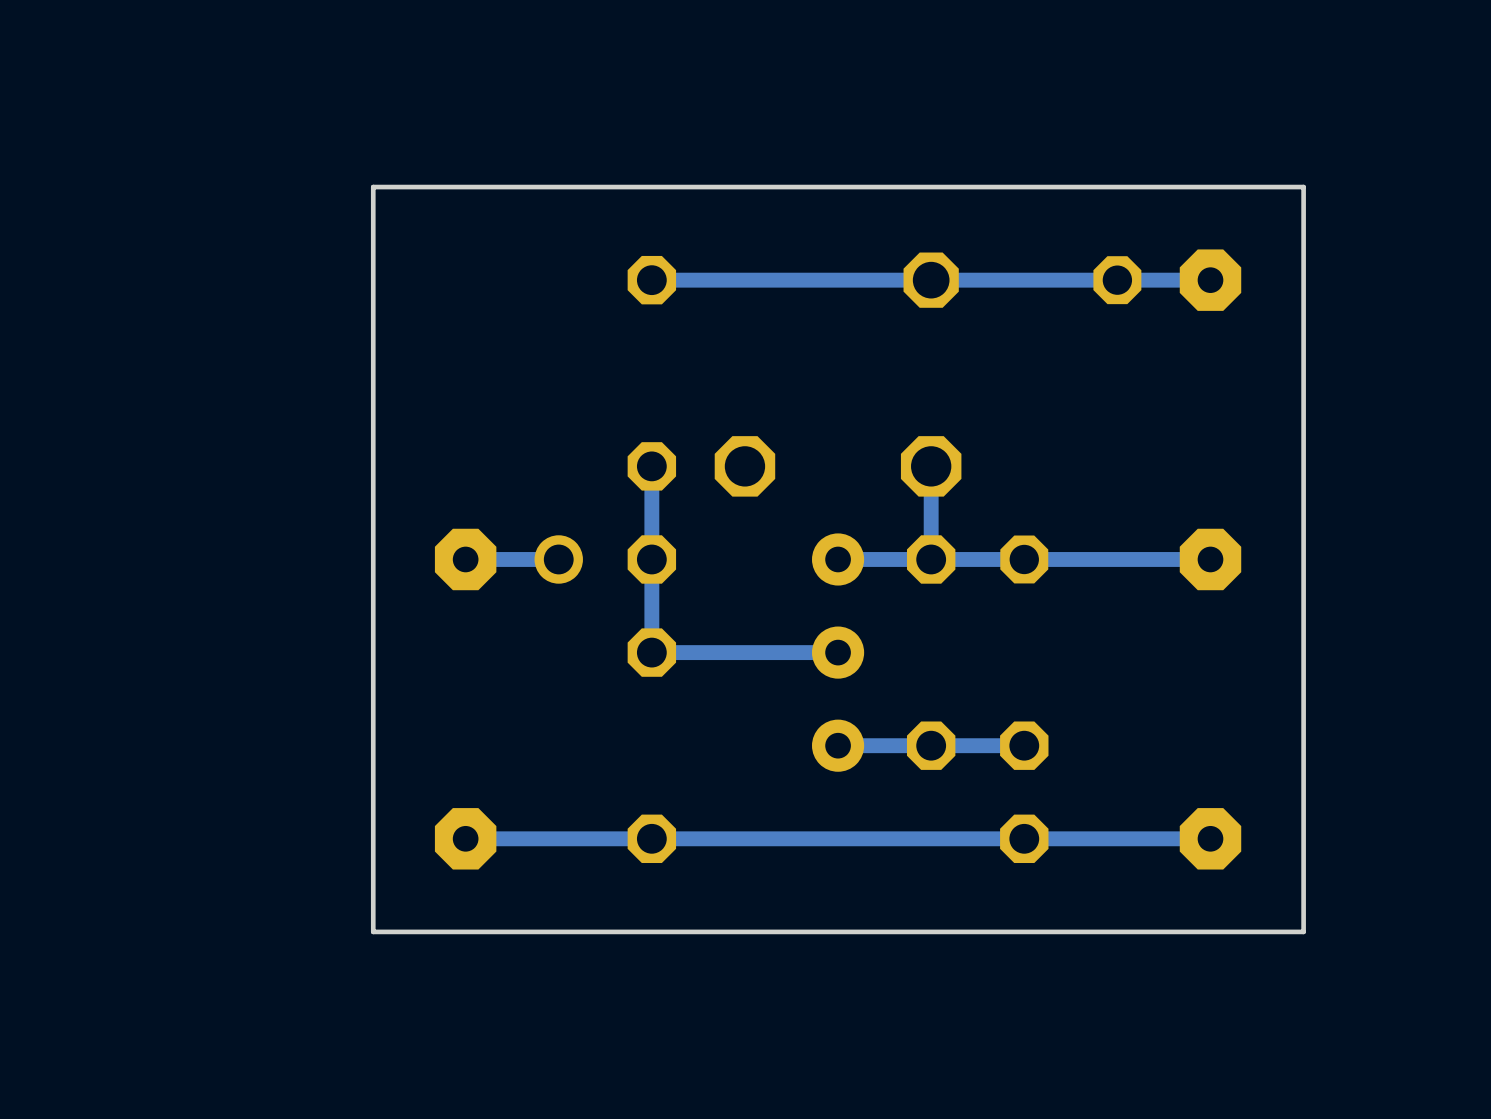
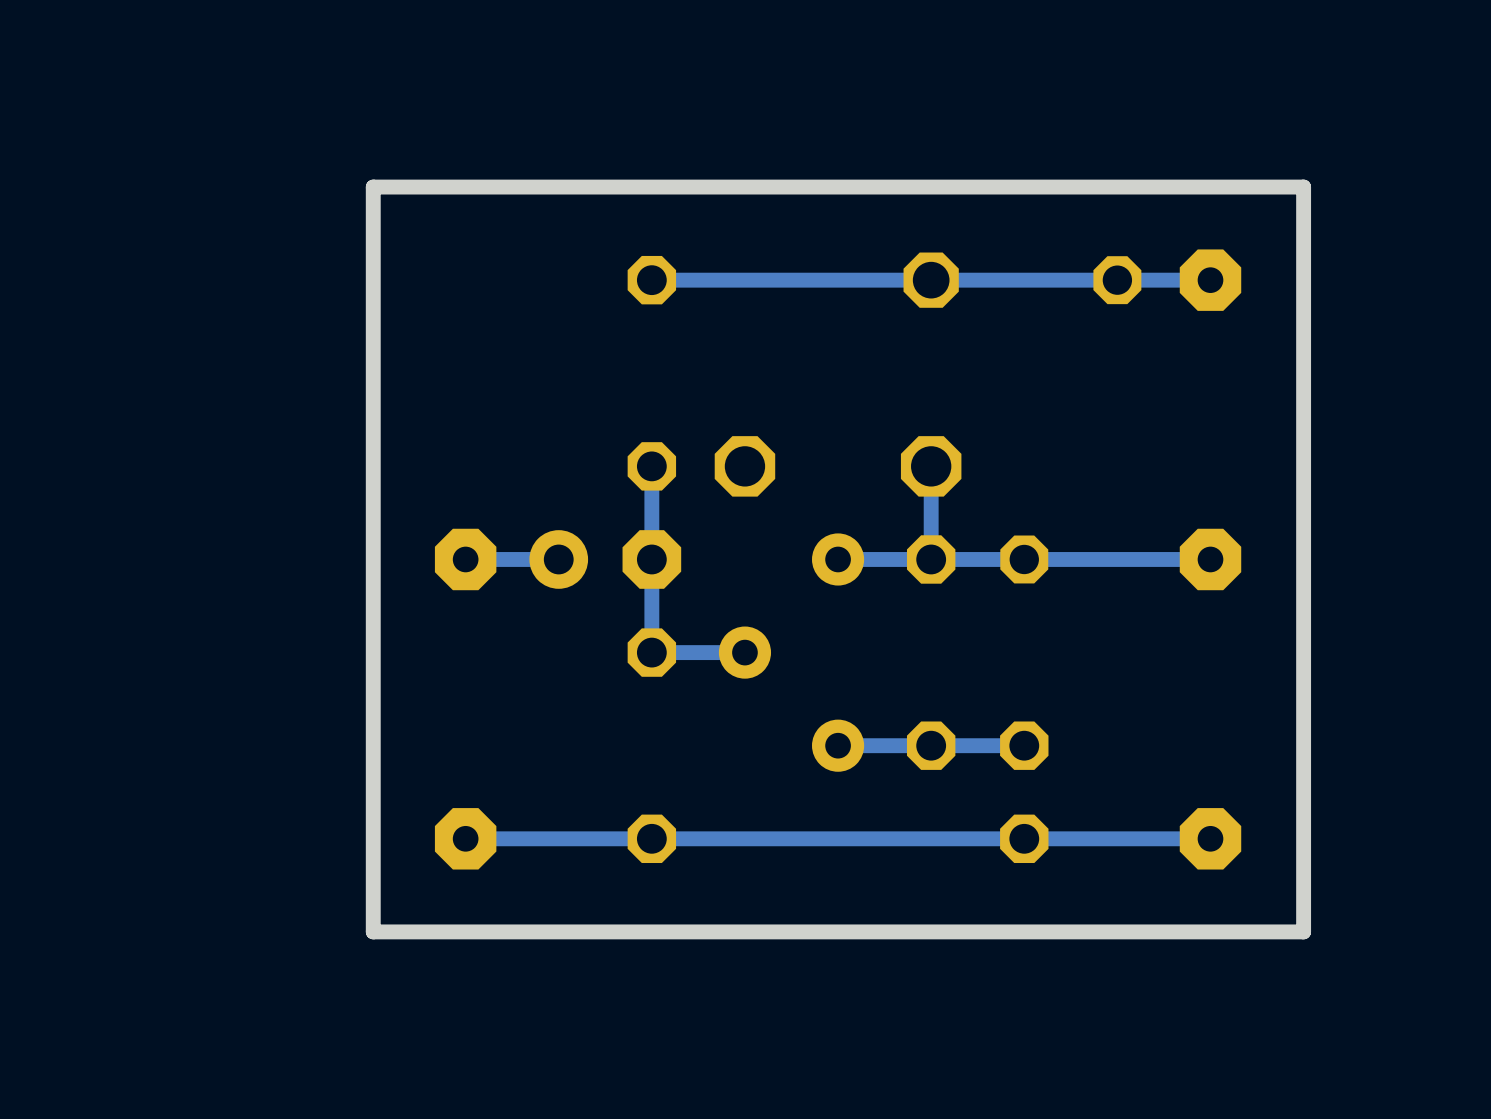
board edge width: thin (1303, 187) (373, 187) (373, 931) (1303, 931) (1303, 187) -> thick (1303, 187) (373, 187) (373, 931) (1303, 931) (1303, 187)
part footprint: [534, 535, 677, 584] -> [529, 530, 682, 589]
part: none -> (791, 652)
track: (838, 652) (744, 652) -> none
part: (838, 652) -> none

